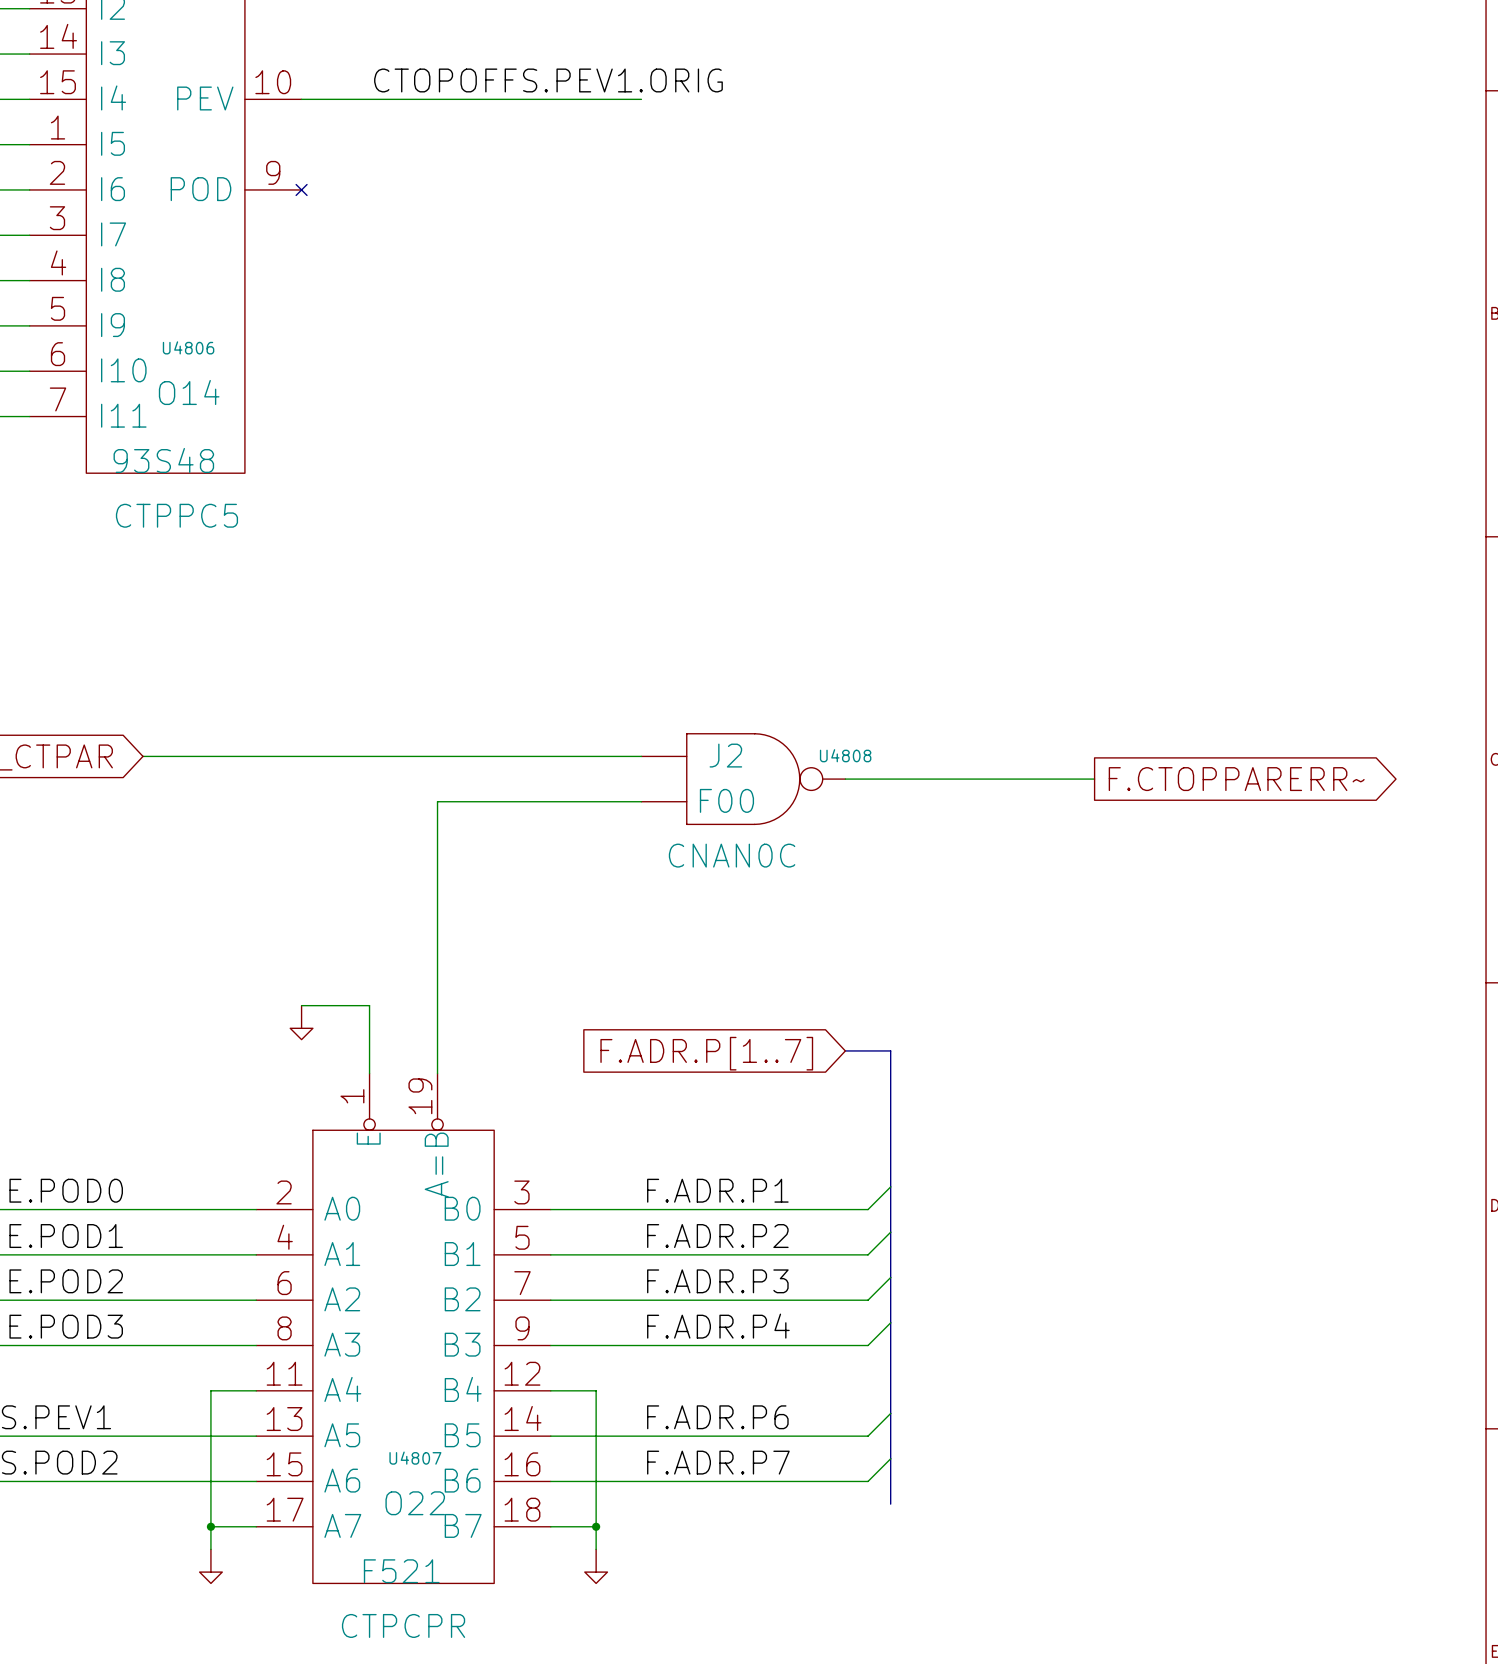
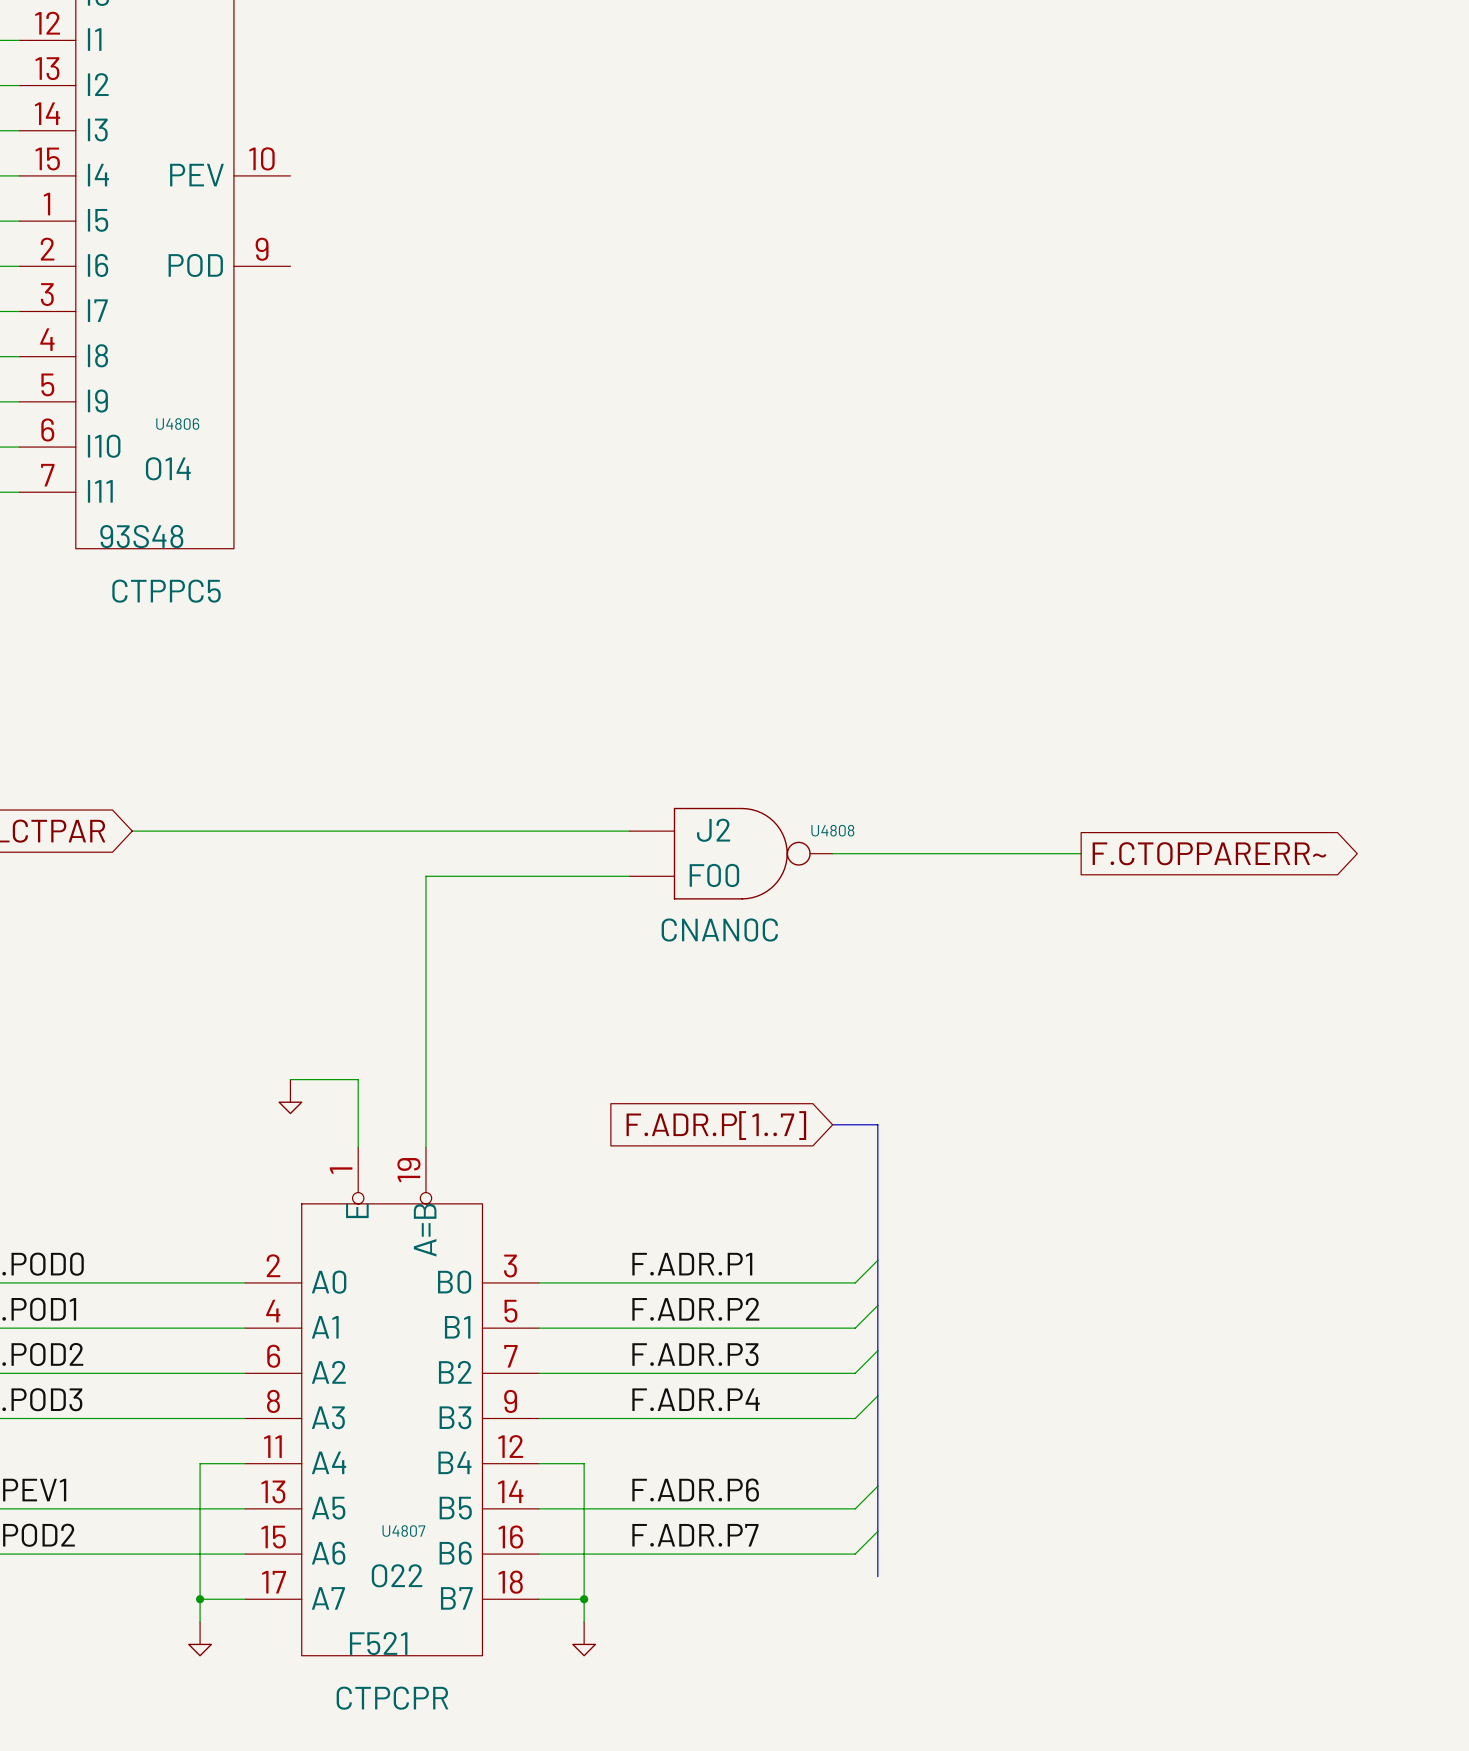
label: CTOPOFFS.PEV1.ORIG (548, 80) -> none
wire: (301, 99) (641, 99) -> none
no-connect mark: (301, 189) -> none

